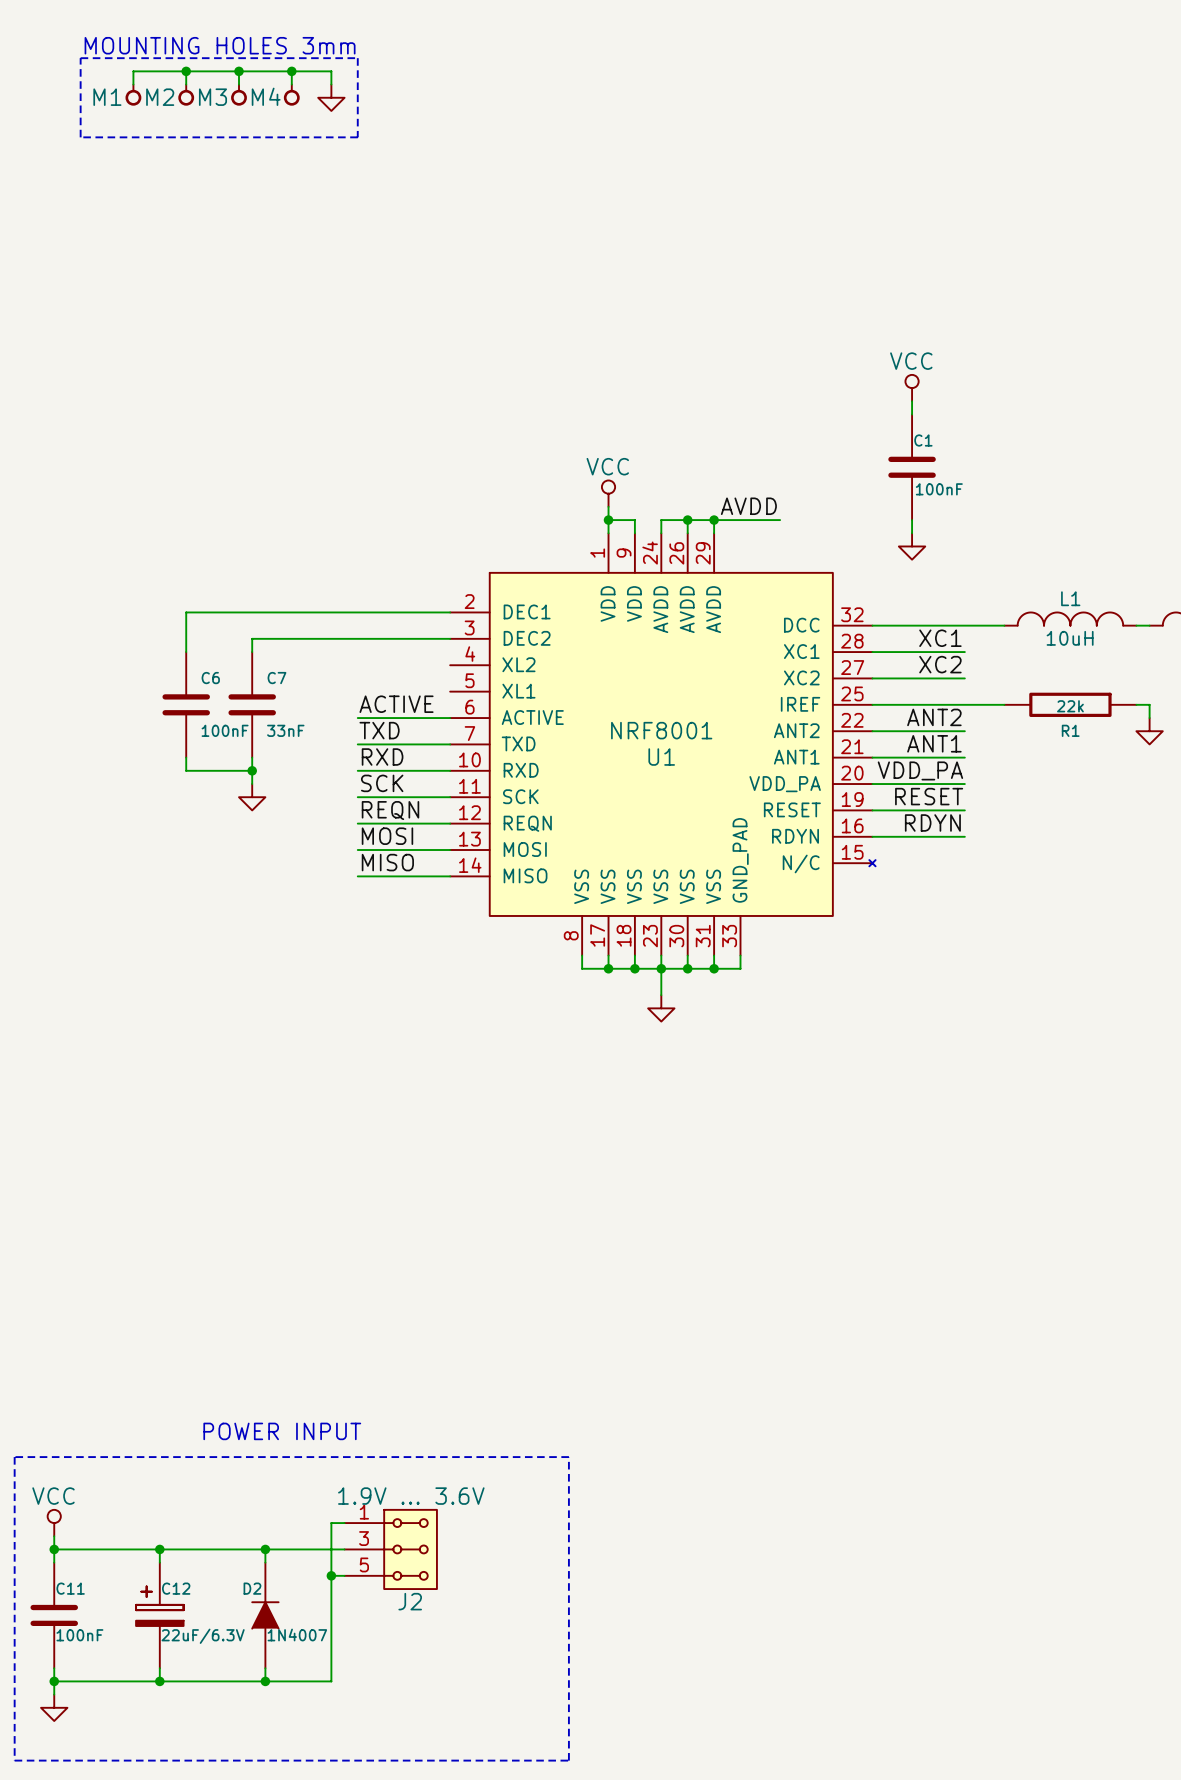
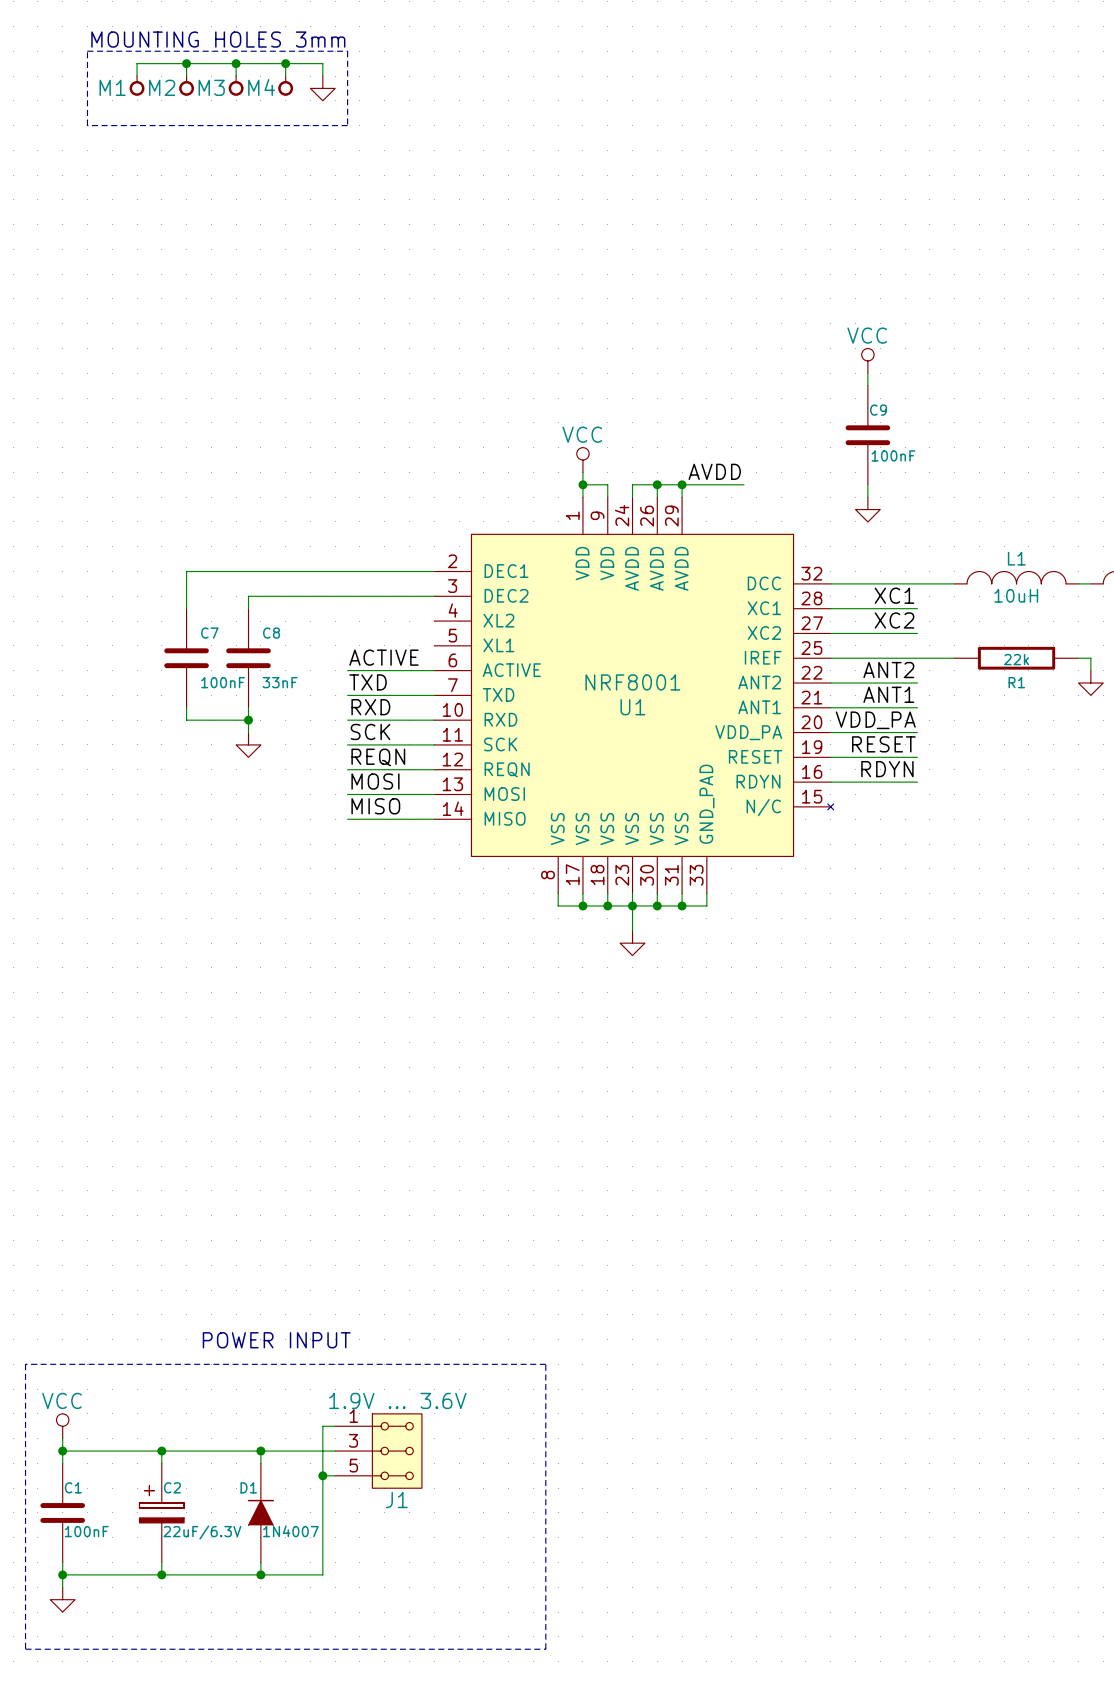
C1 name: C1 (923, 440) -> C9 (878, 410)
C6 name: C6 (210, 678) -> C7 (209, 633)
C7 name: C7 (276, 678) -> C8 (271, 633)
C11 name: C11 (70, 1588) -> C1 (73, 1487)
C12 name: C12 (176, 1588) -> C2 (172, 1487)
D2 name: D2 (252, 1588) -> D1 (248, 1487)
J2 name: J2 (410, 1601) -> J1 (396, 1500)

